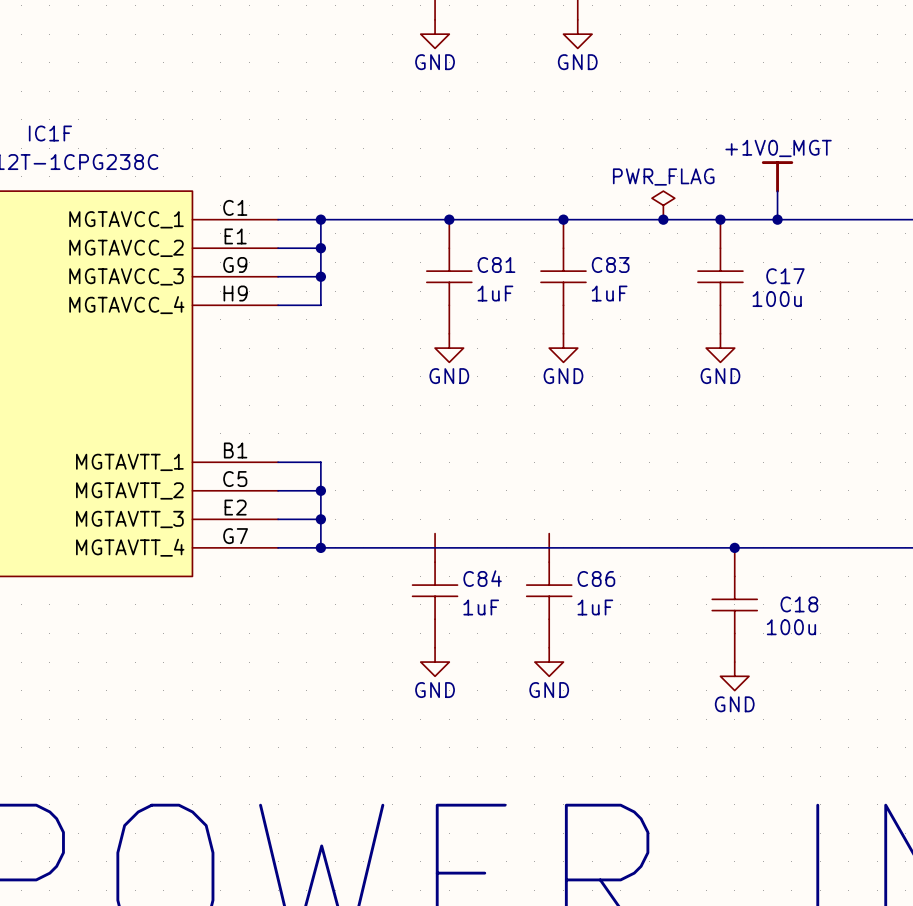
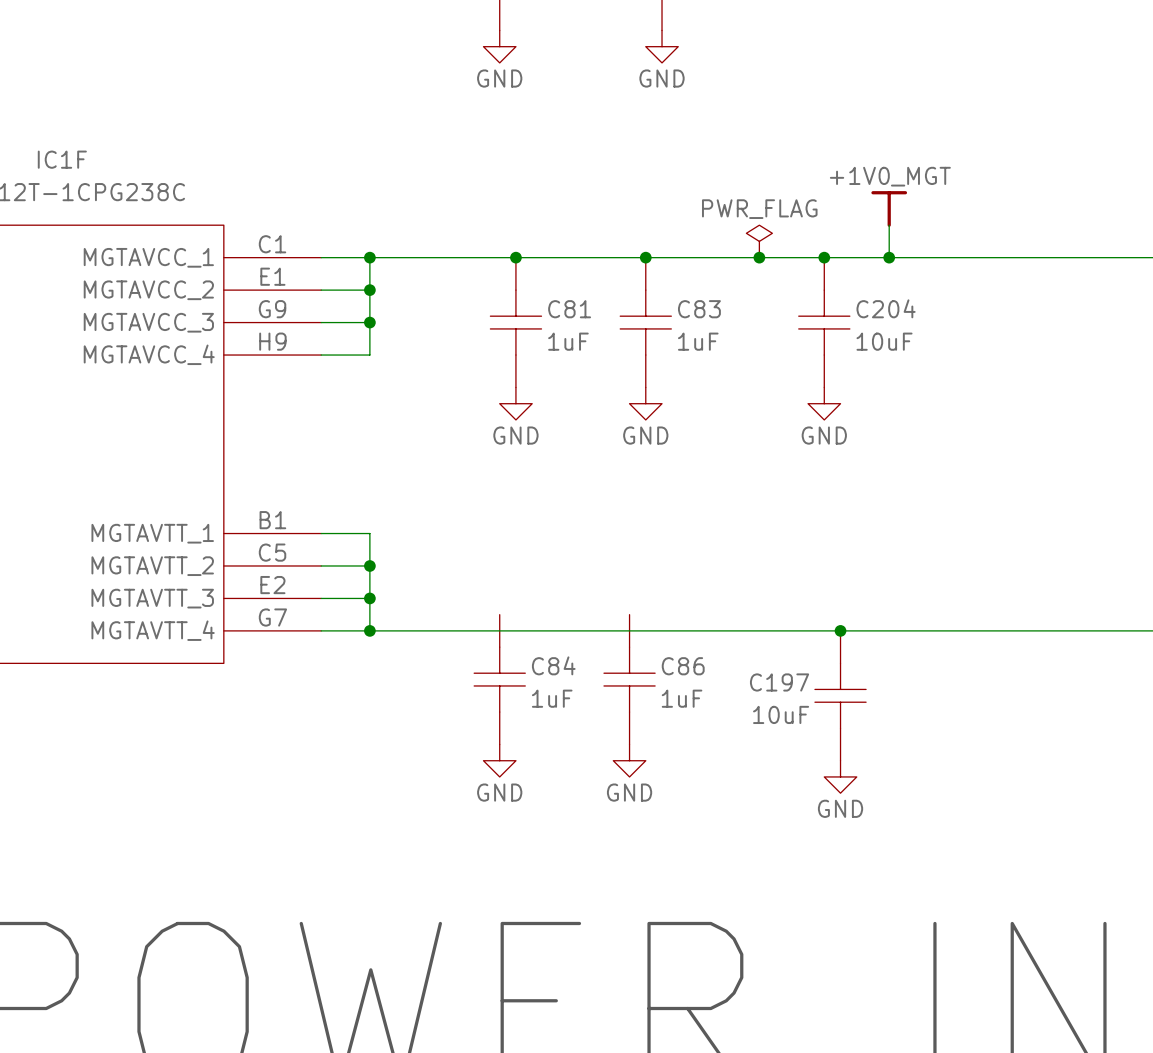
C17 name: C17 (785, 276) -> C204 (886, 308)
C17 value: 100u (777, 299) -> 10uF (884, 341)
C18 name: C18 (799, 604) -> C197 (779, 682)
C18 value: 100u (791, 627) -> 10uF (781, 714)

